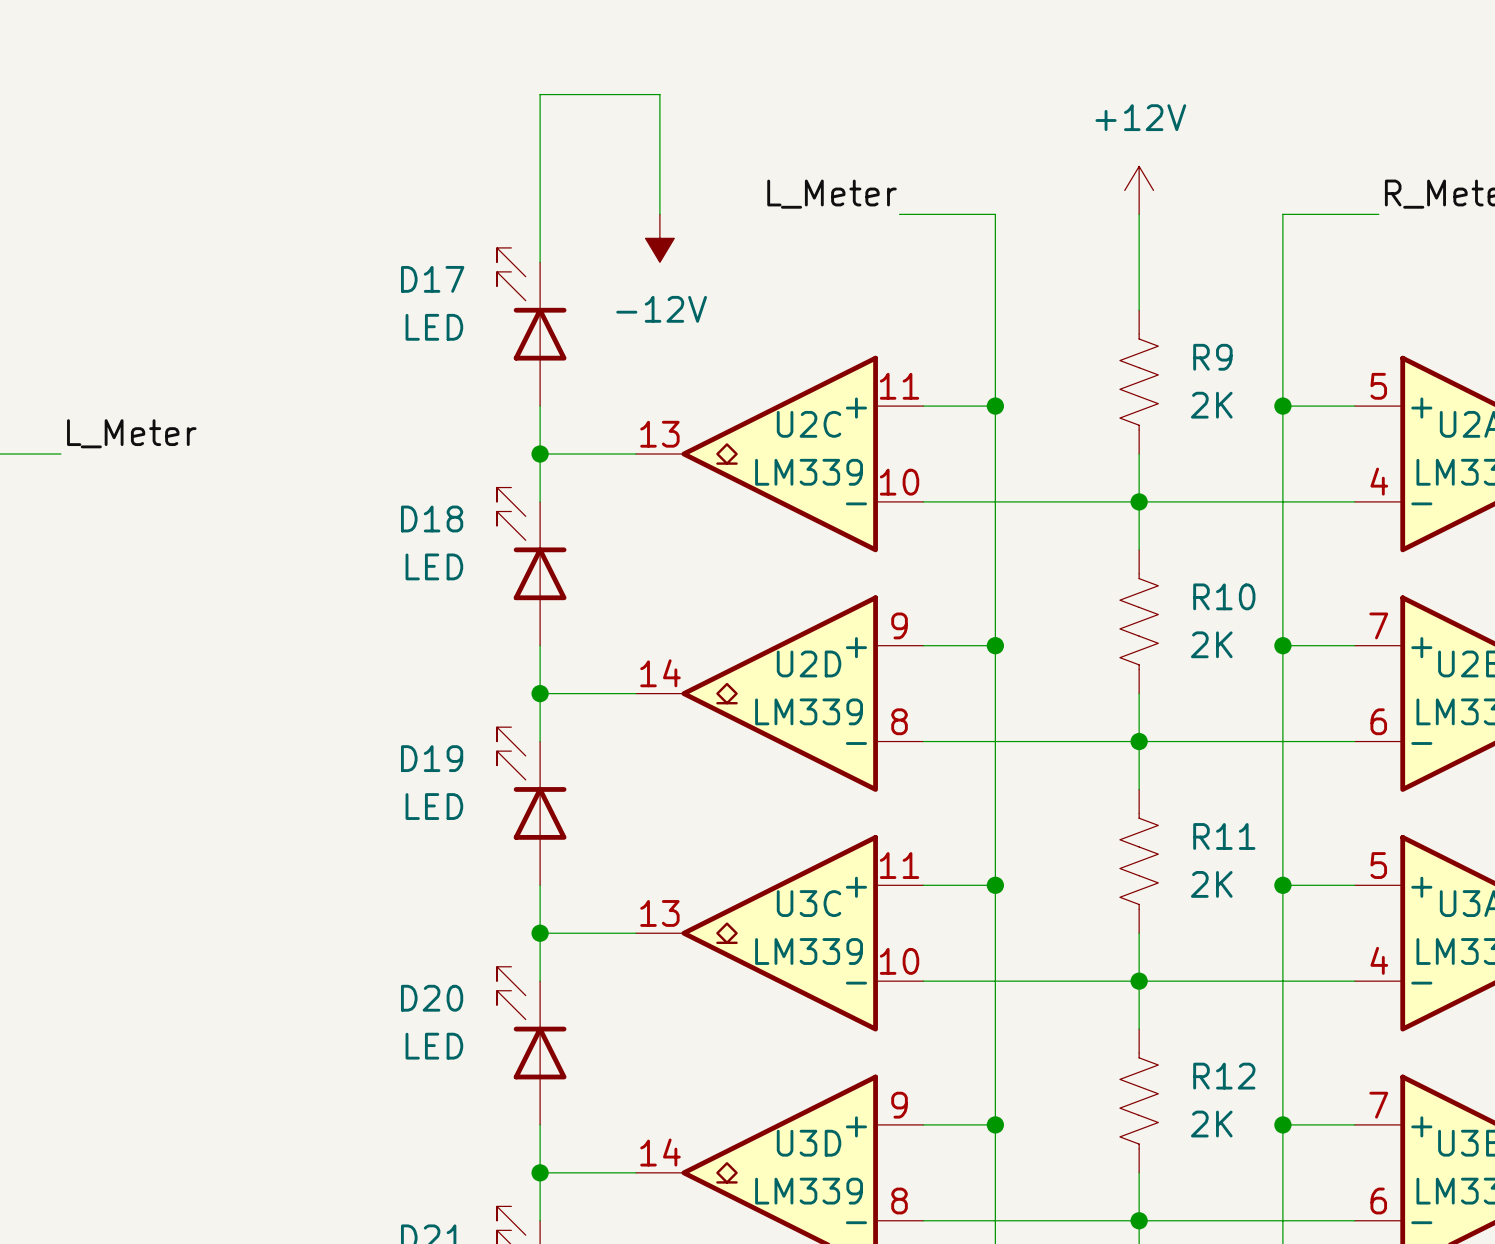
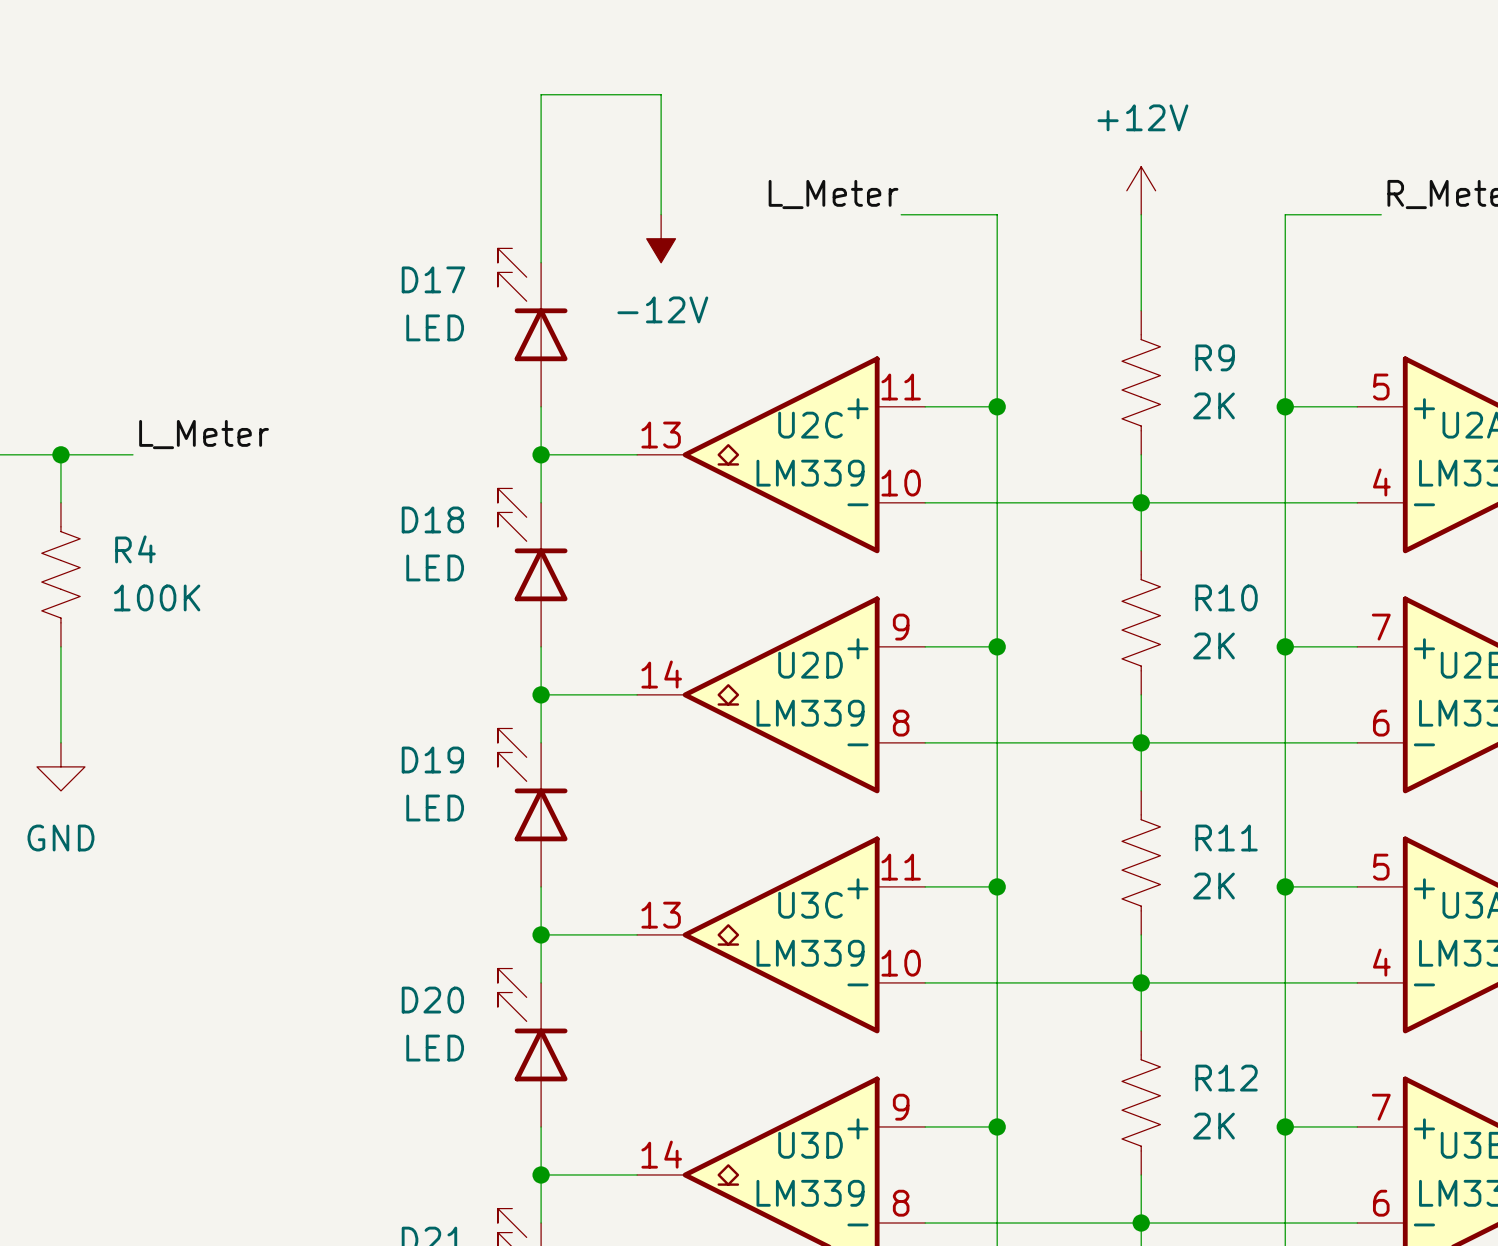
label position: L_Meter (131, 433) -> L_Meter (204, 434)
junction: none -> (60, 454)
wire: none -> (132, 454) (60, 454) (60, 502)
R4: none -> 100K (60, 574)
wire: none -> (60, 646) (60, 742)
power symbol: none -> GND (60, 766)

